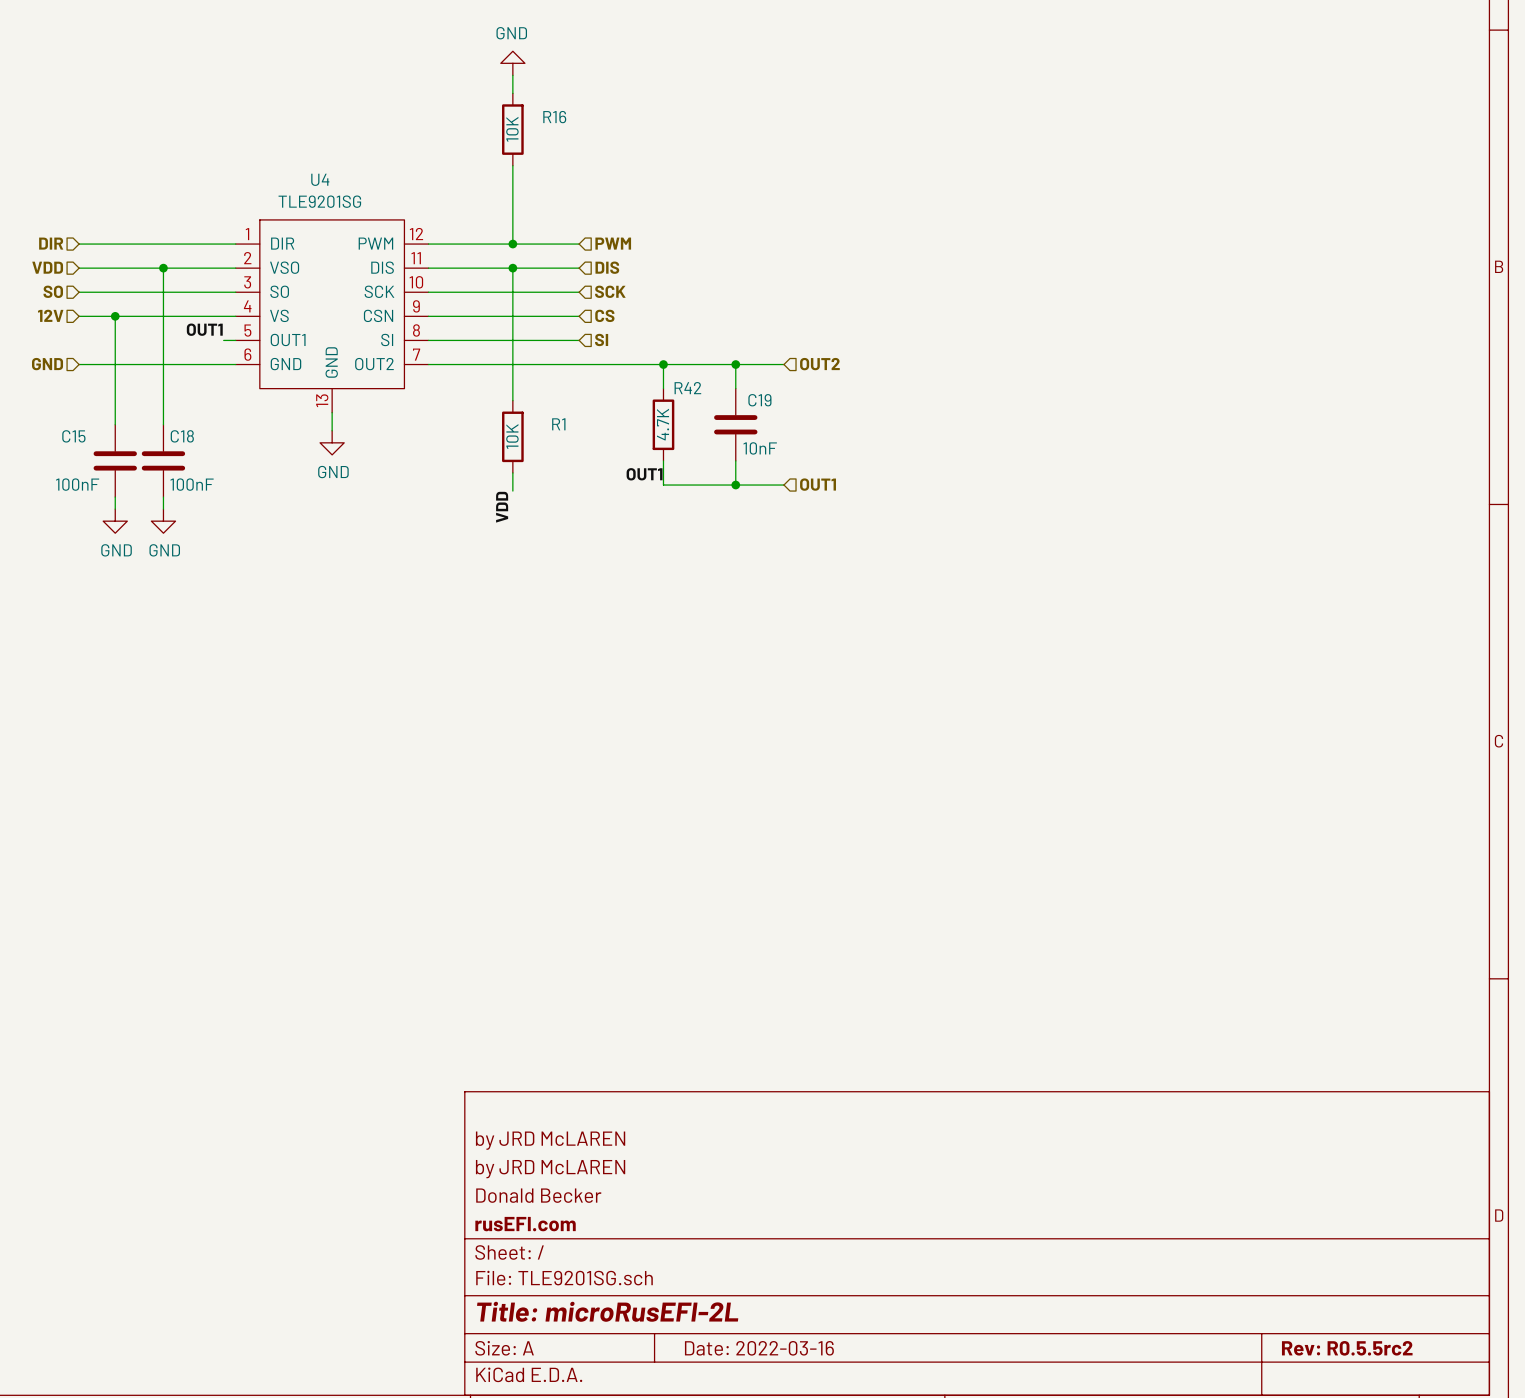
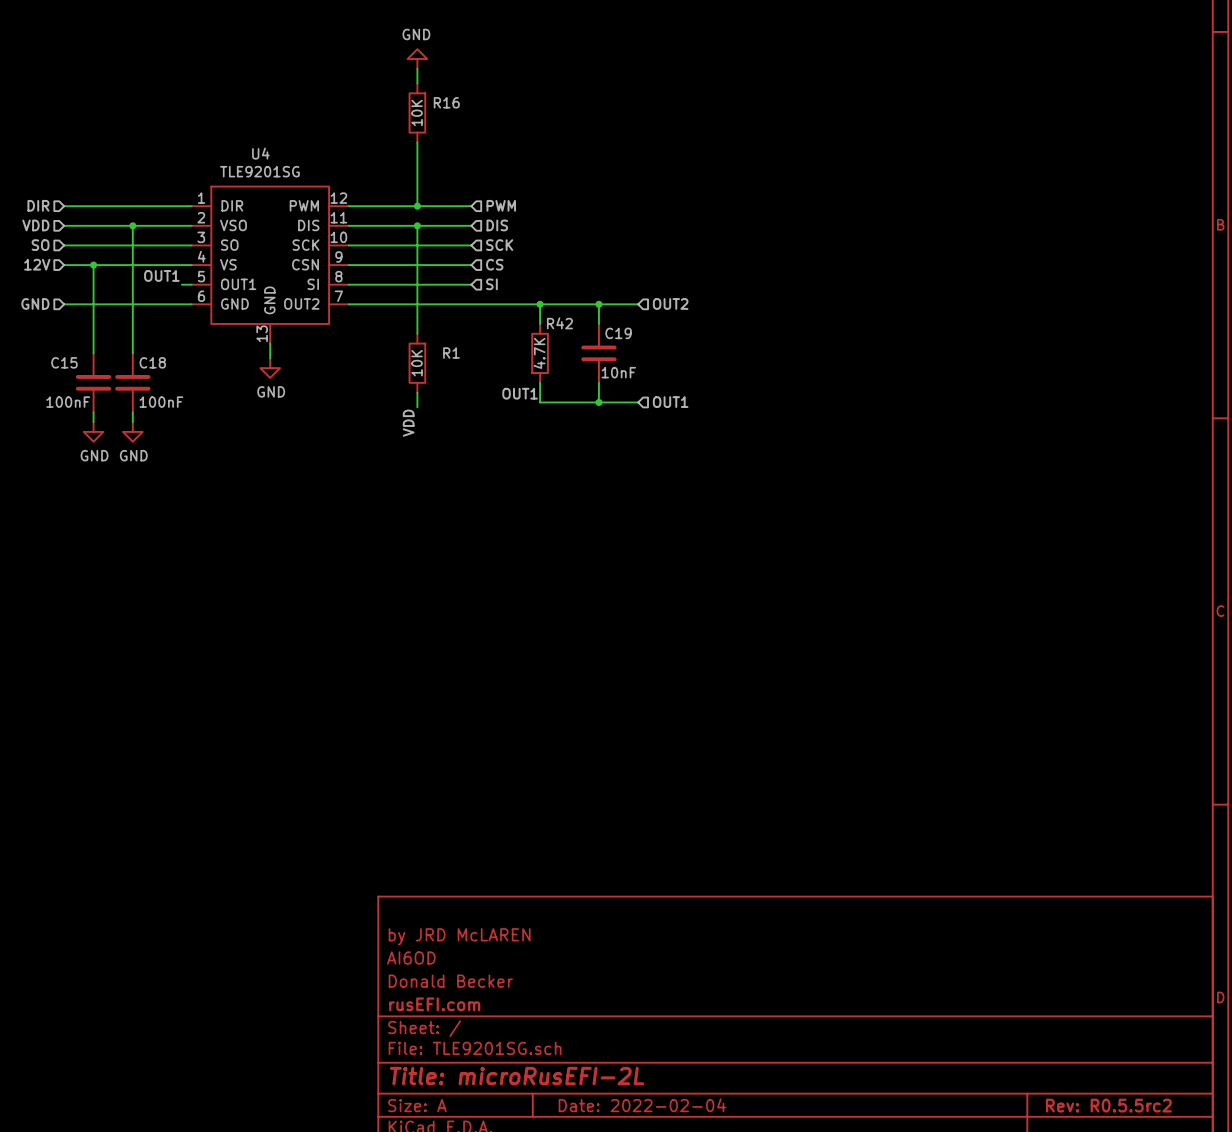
title block: by JRD McLAREN (550, 1169) -> AI6OD (411, 957)
title block: Date: 2022-03-16 (759, 1348) -> Date: 2022-02-04 (642, 1105)

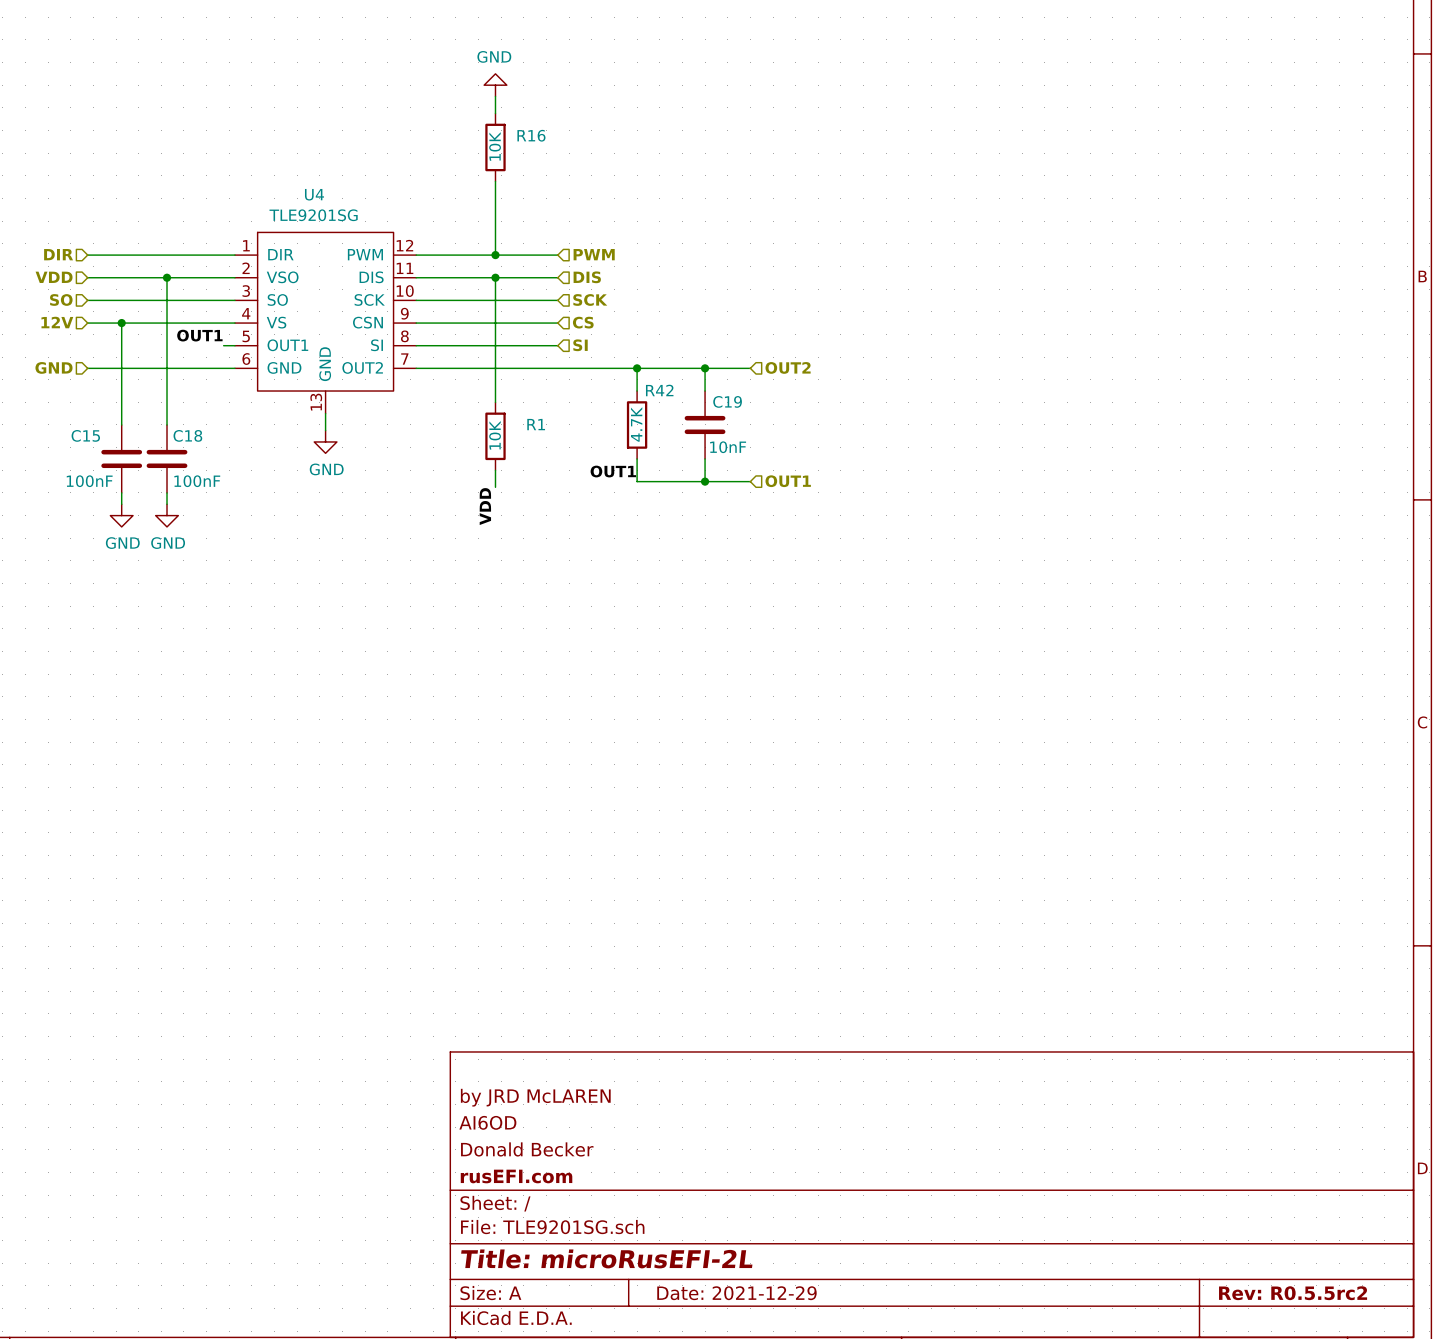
title block: Date: 2022-02-04 (642, 1105) -> Date: 2021-12-29 (736, 1293)

